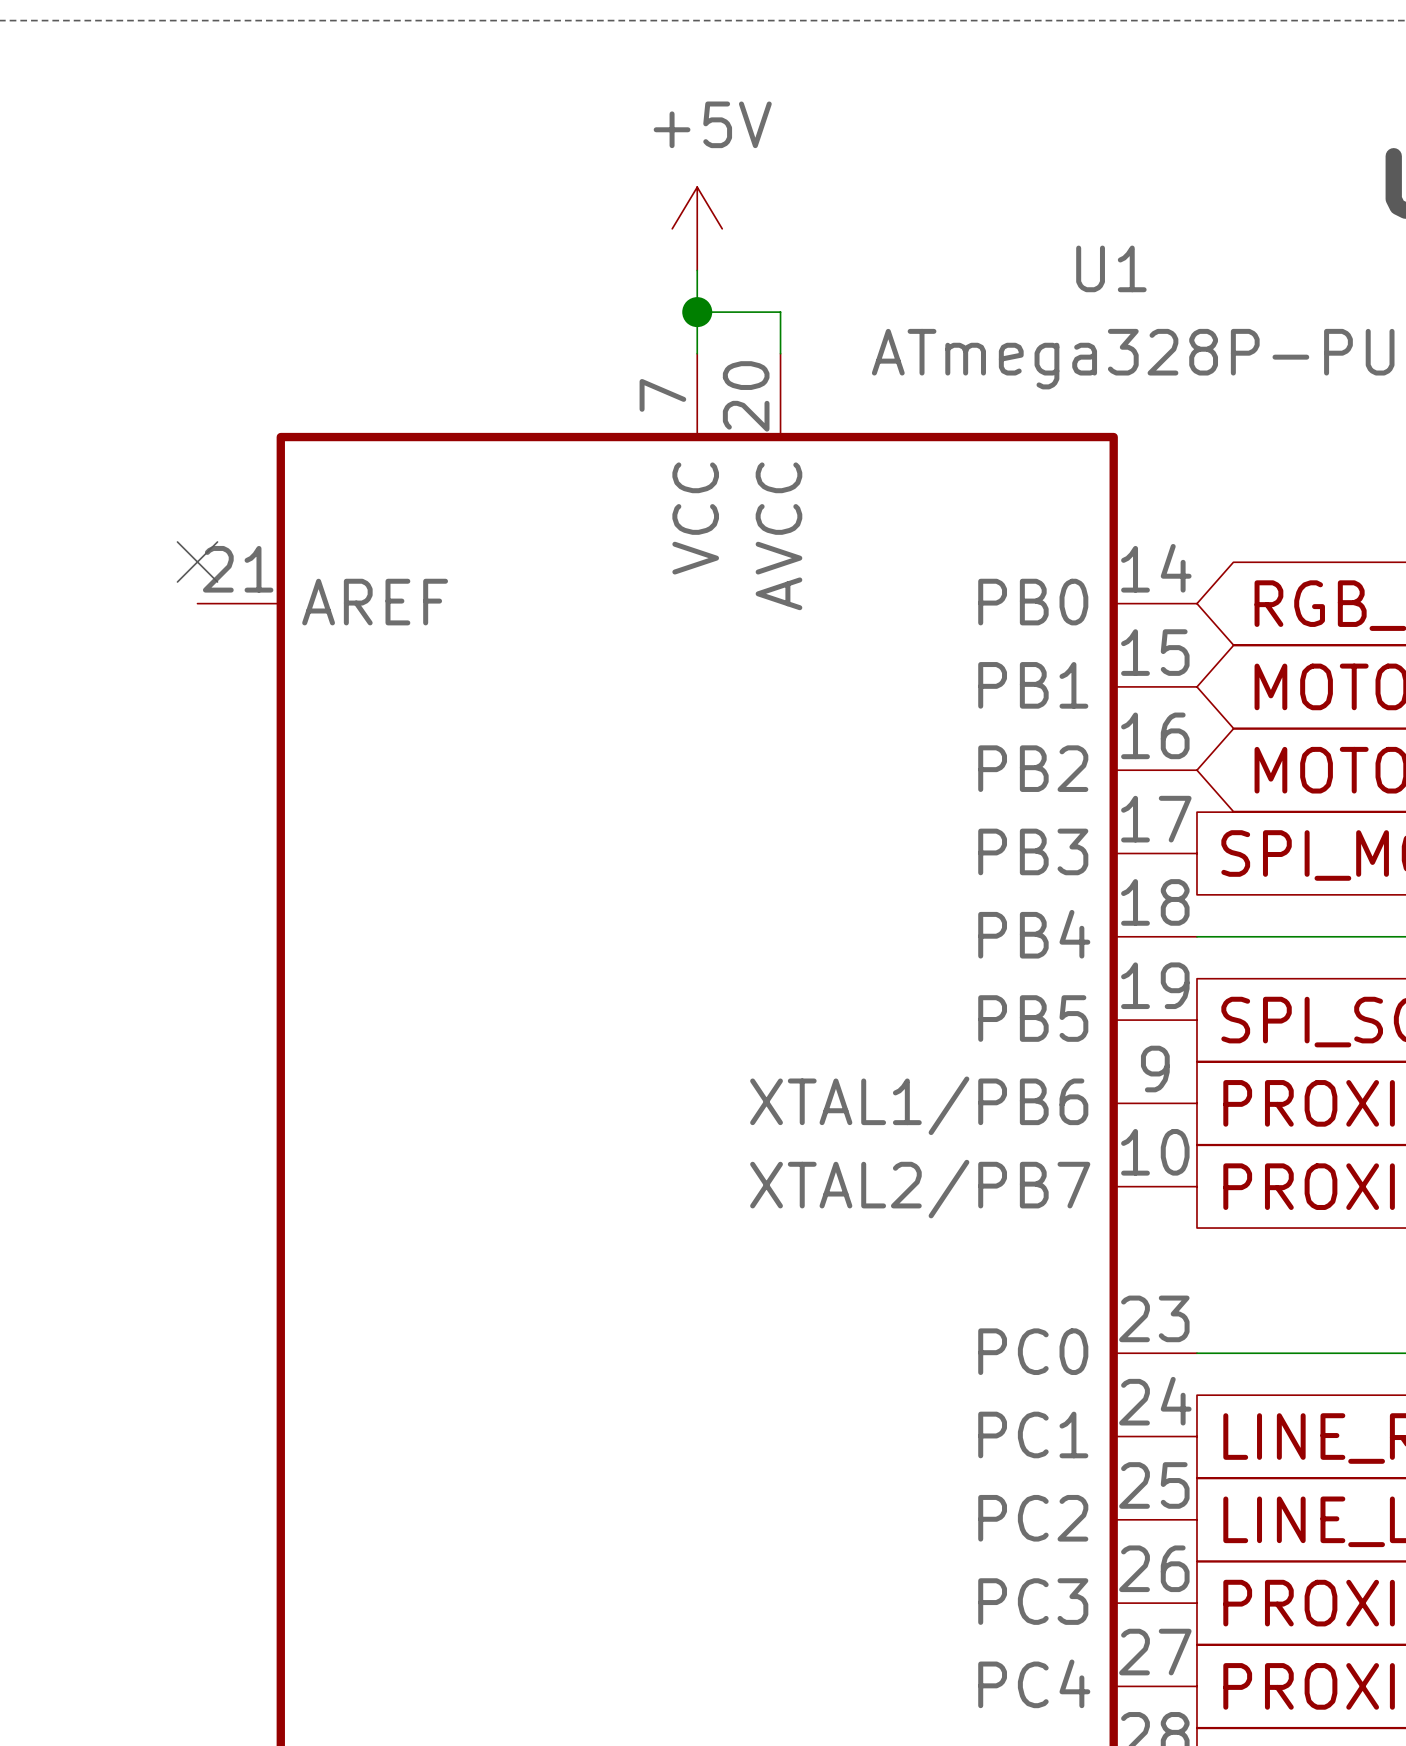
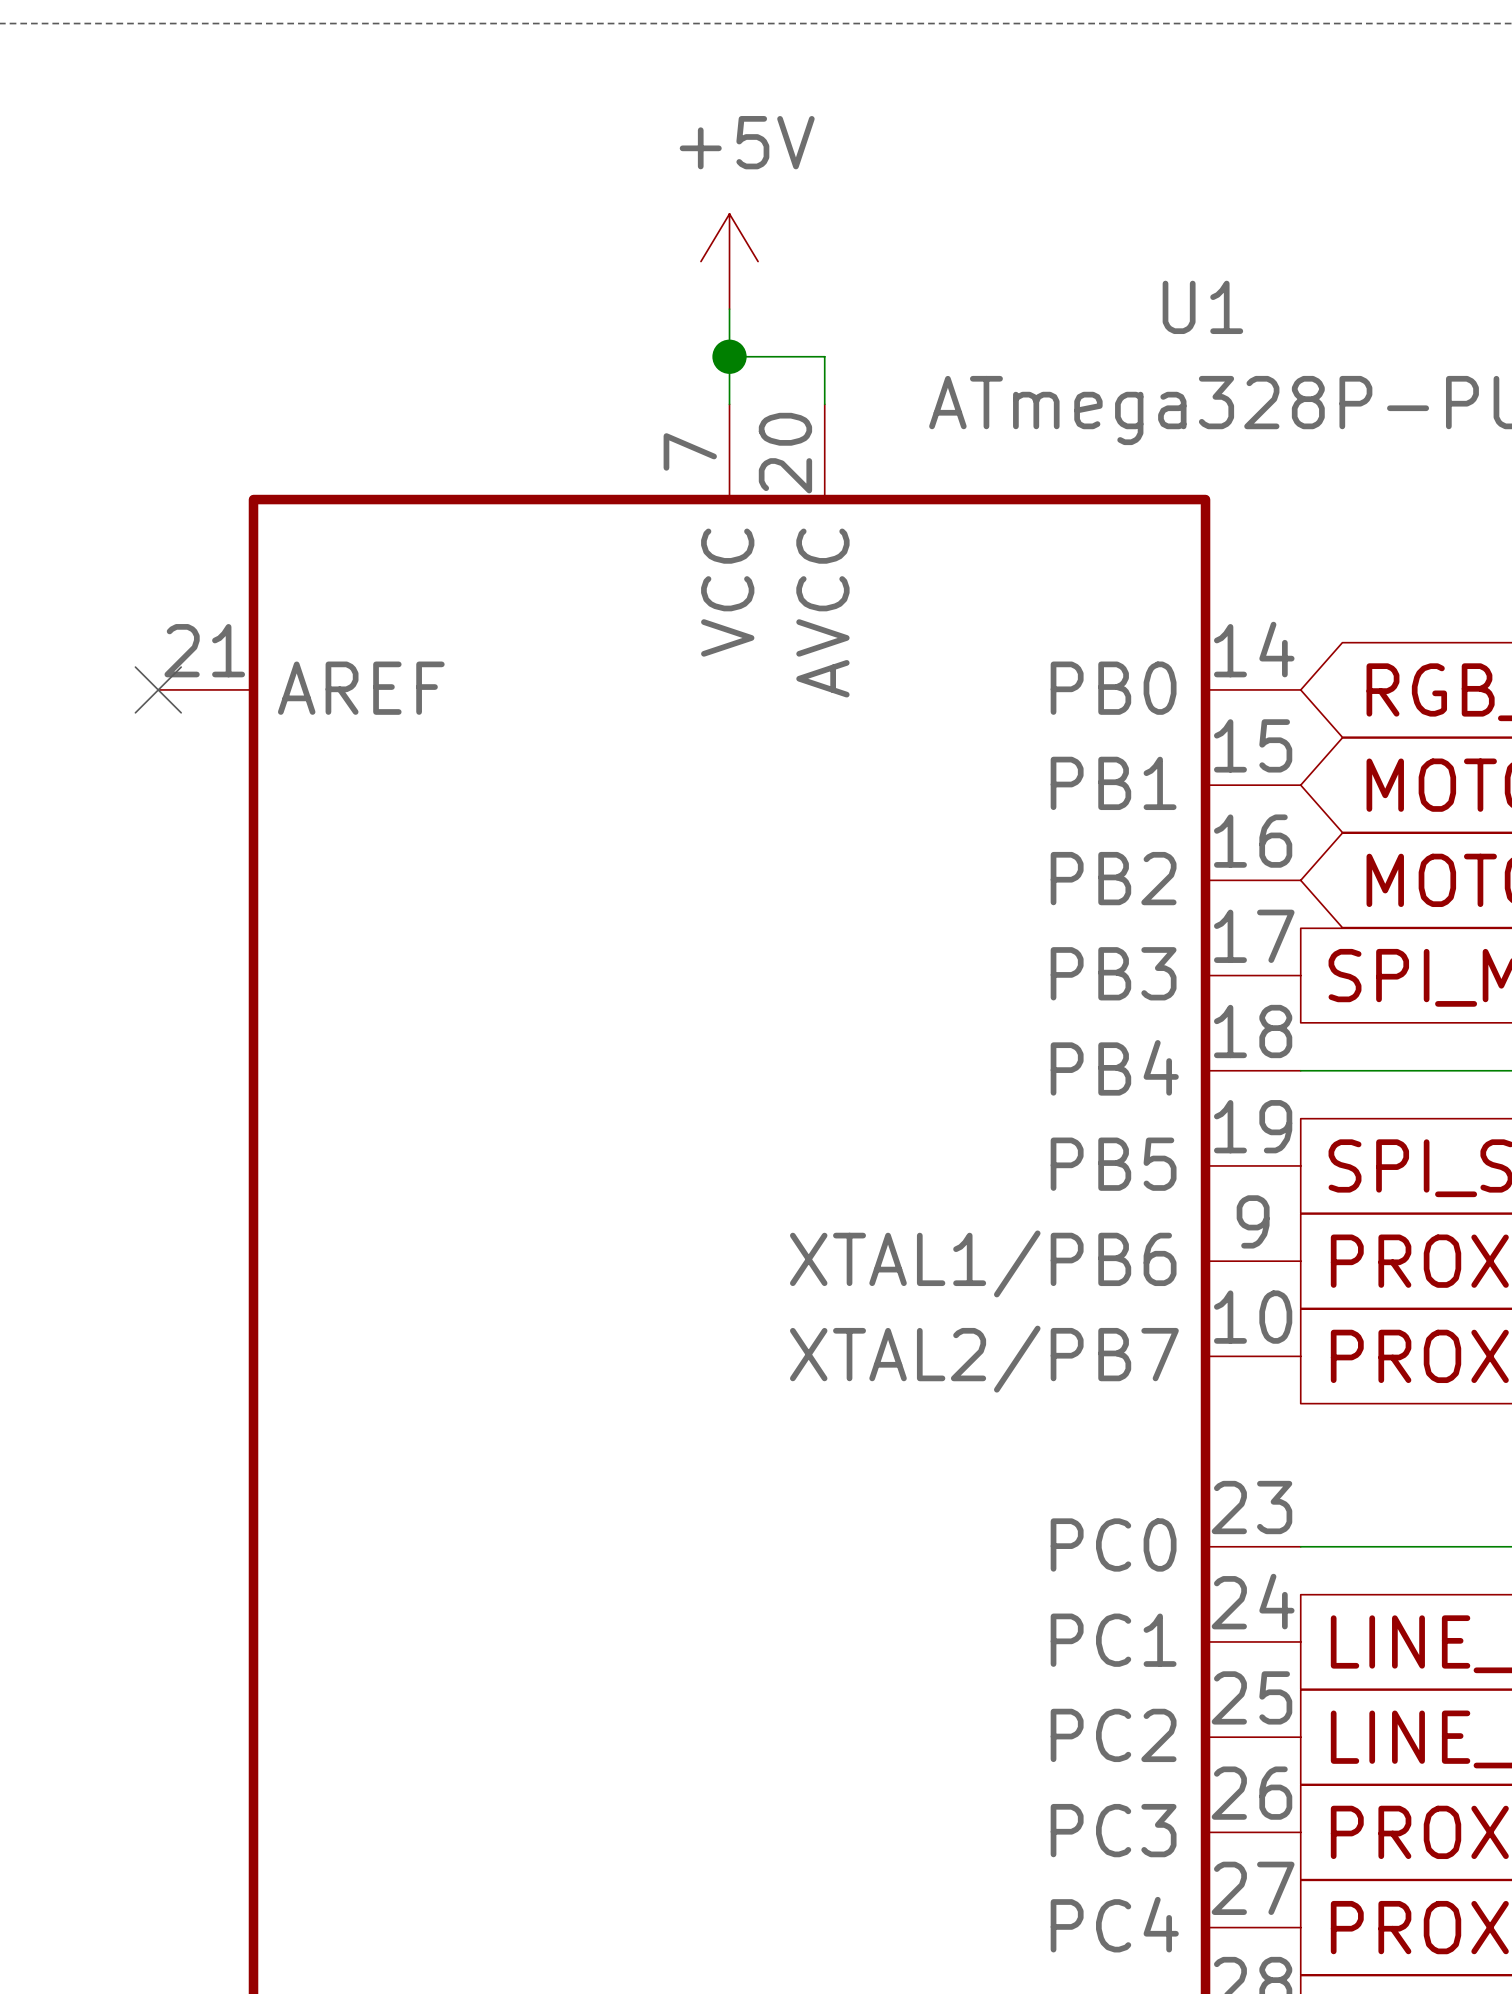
no-connect mark position: (197, 561) -> (158, 689)

